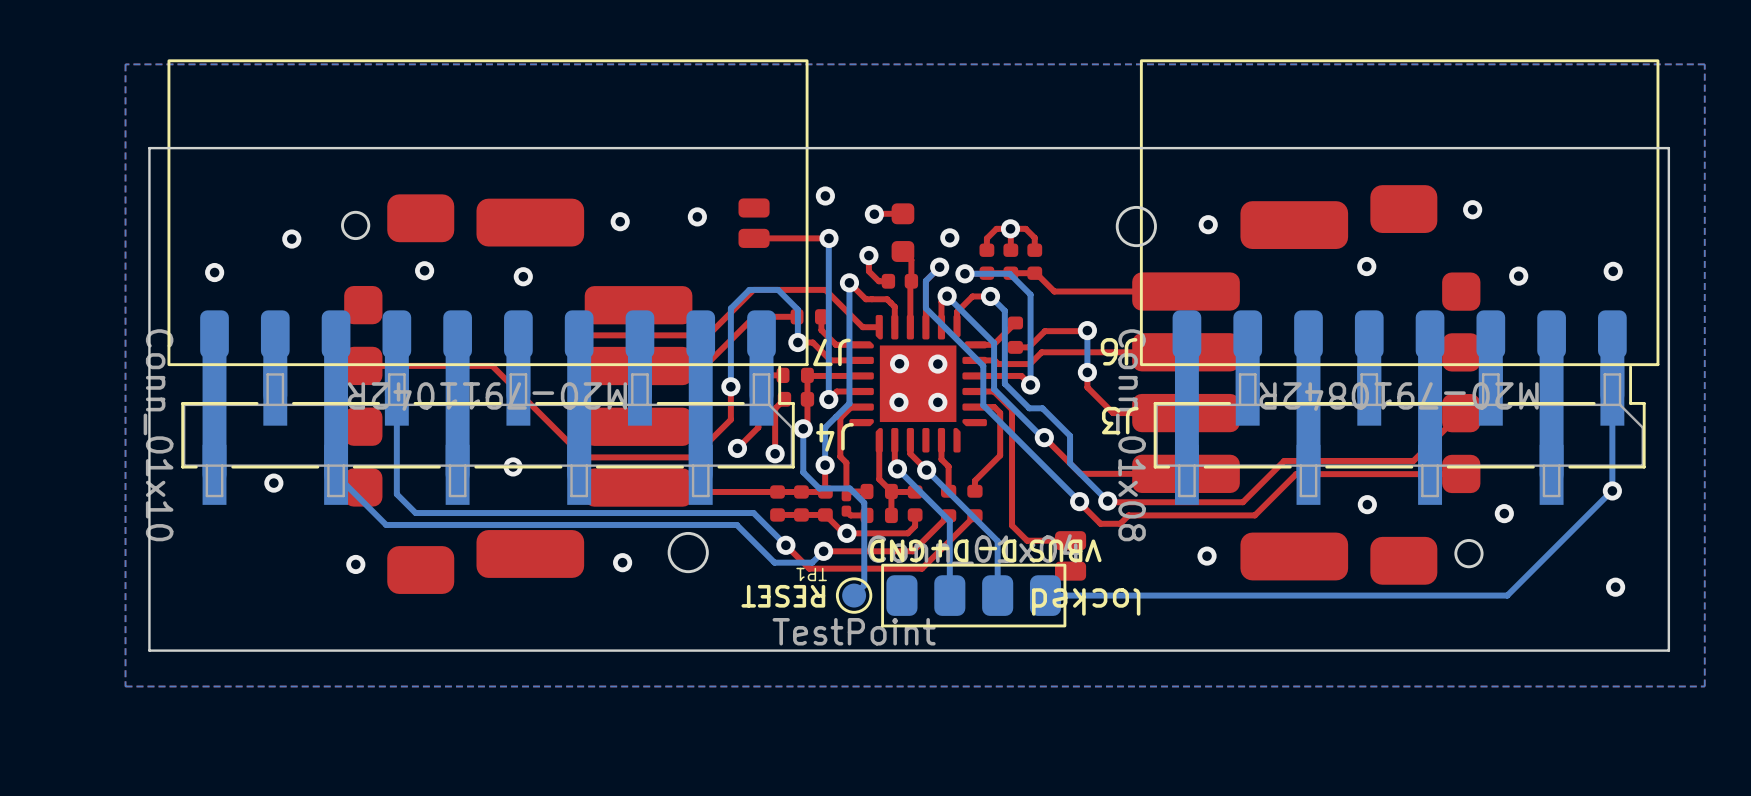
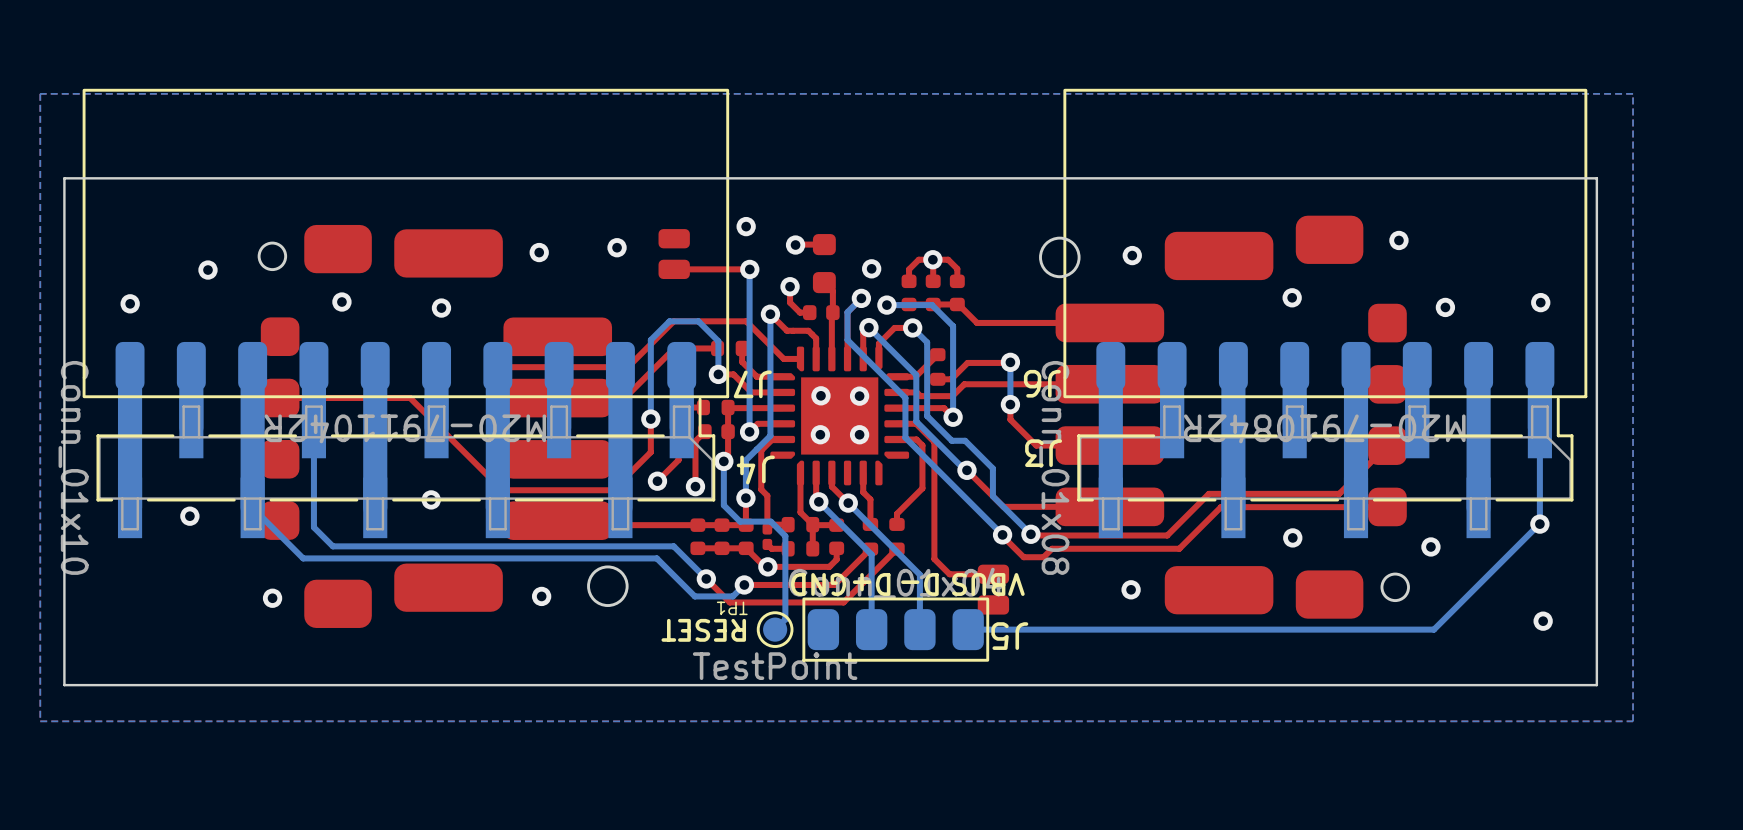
locked name: locked (1086, 601) -> J5 (1009, 636)

